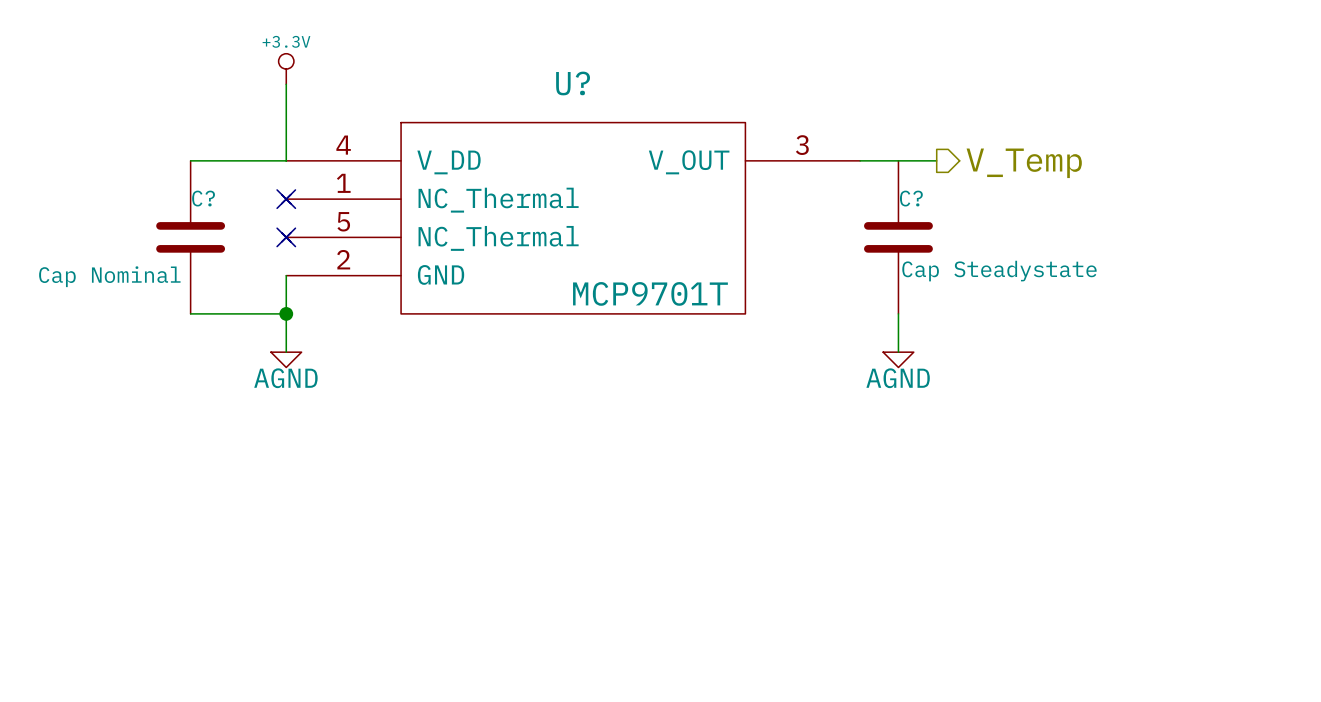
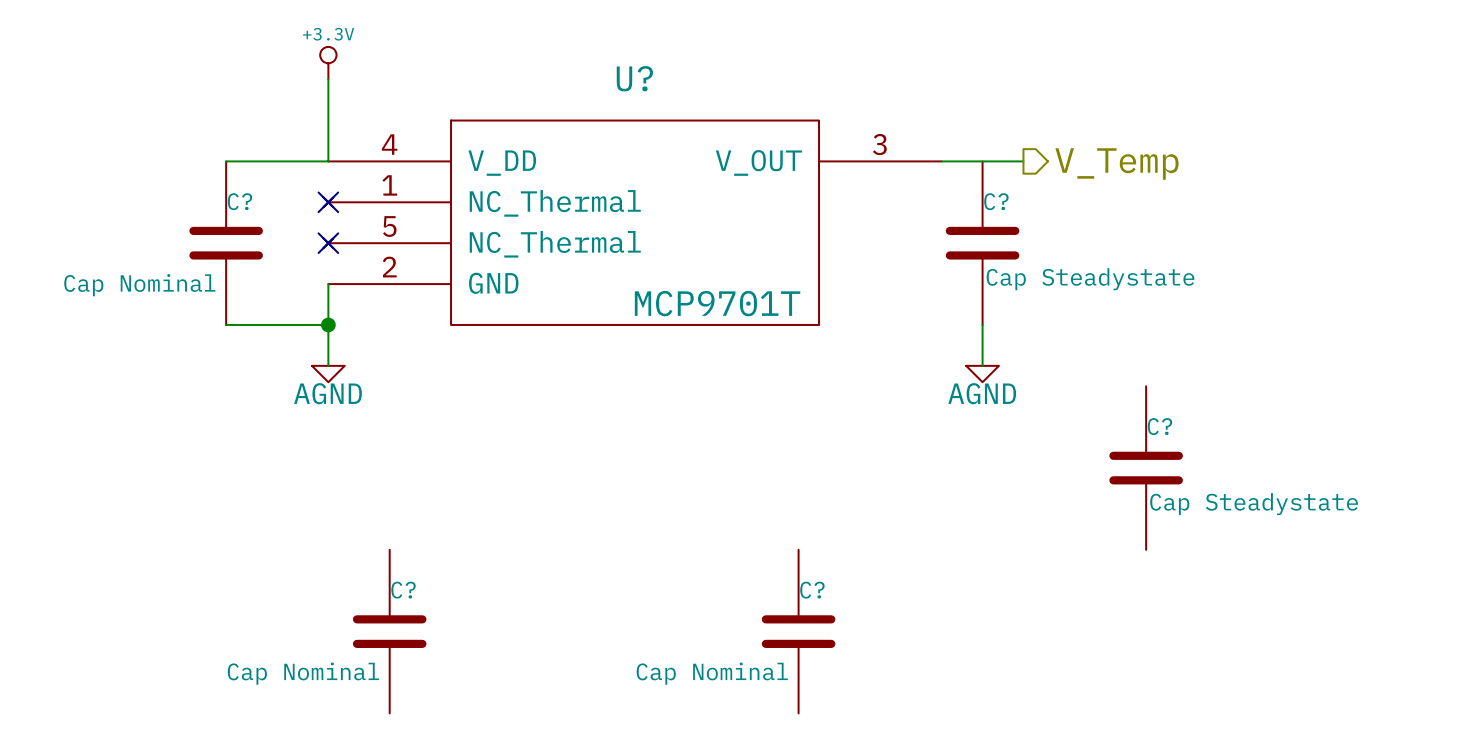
C?: none -> Cap Steadystate (1146, 468)
C?: none -> Cap Nominal (389, 631)
C?: none -> Cap Nominal (798, 631)

